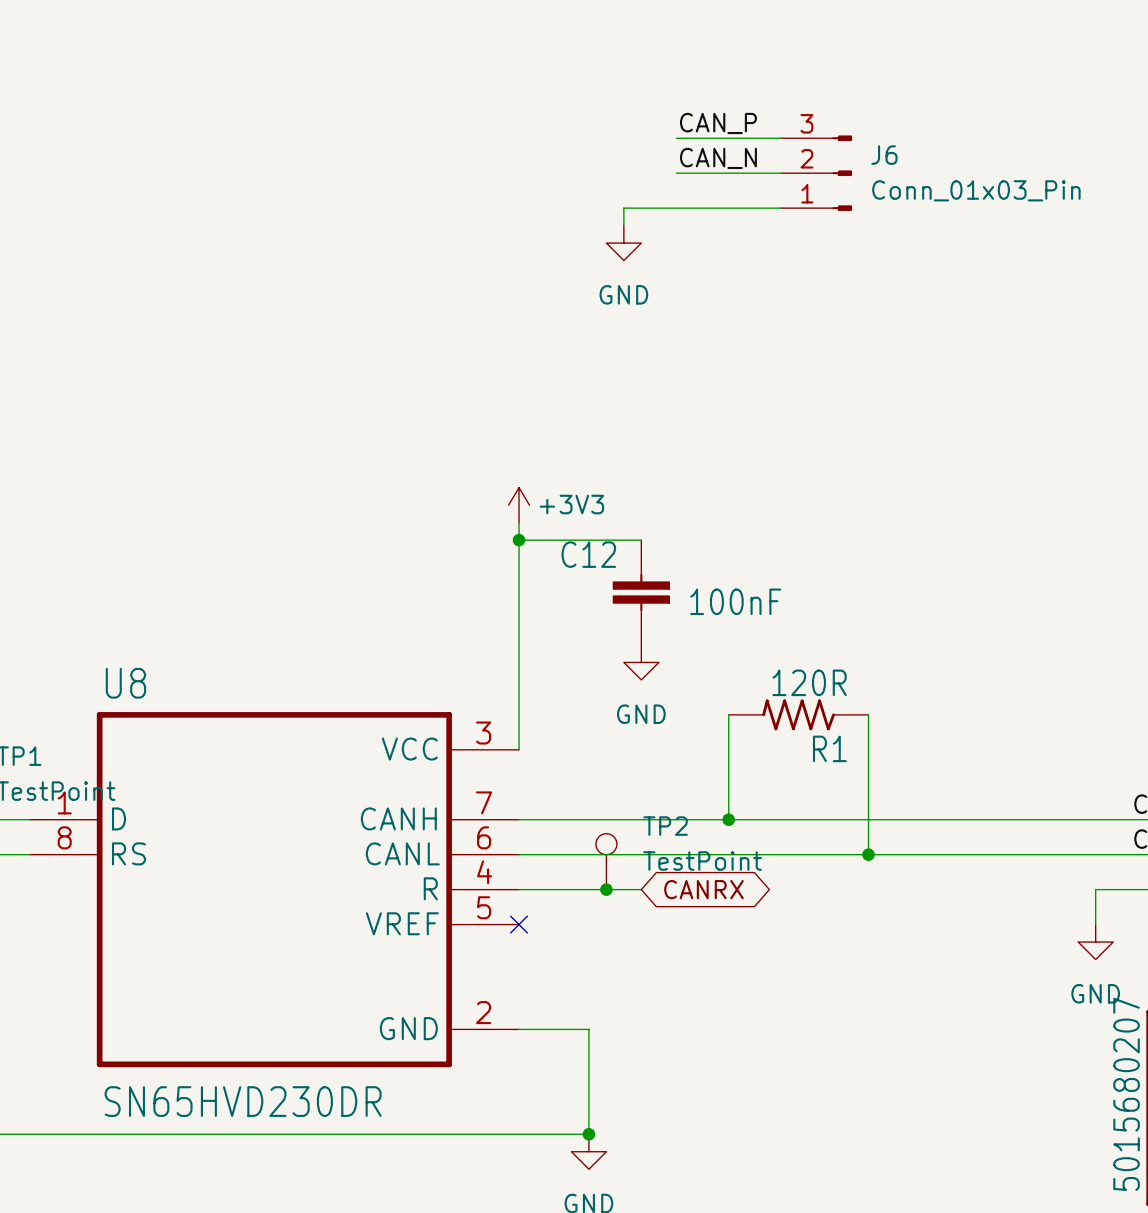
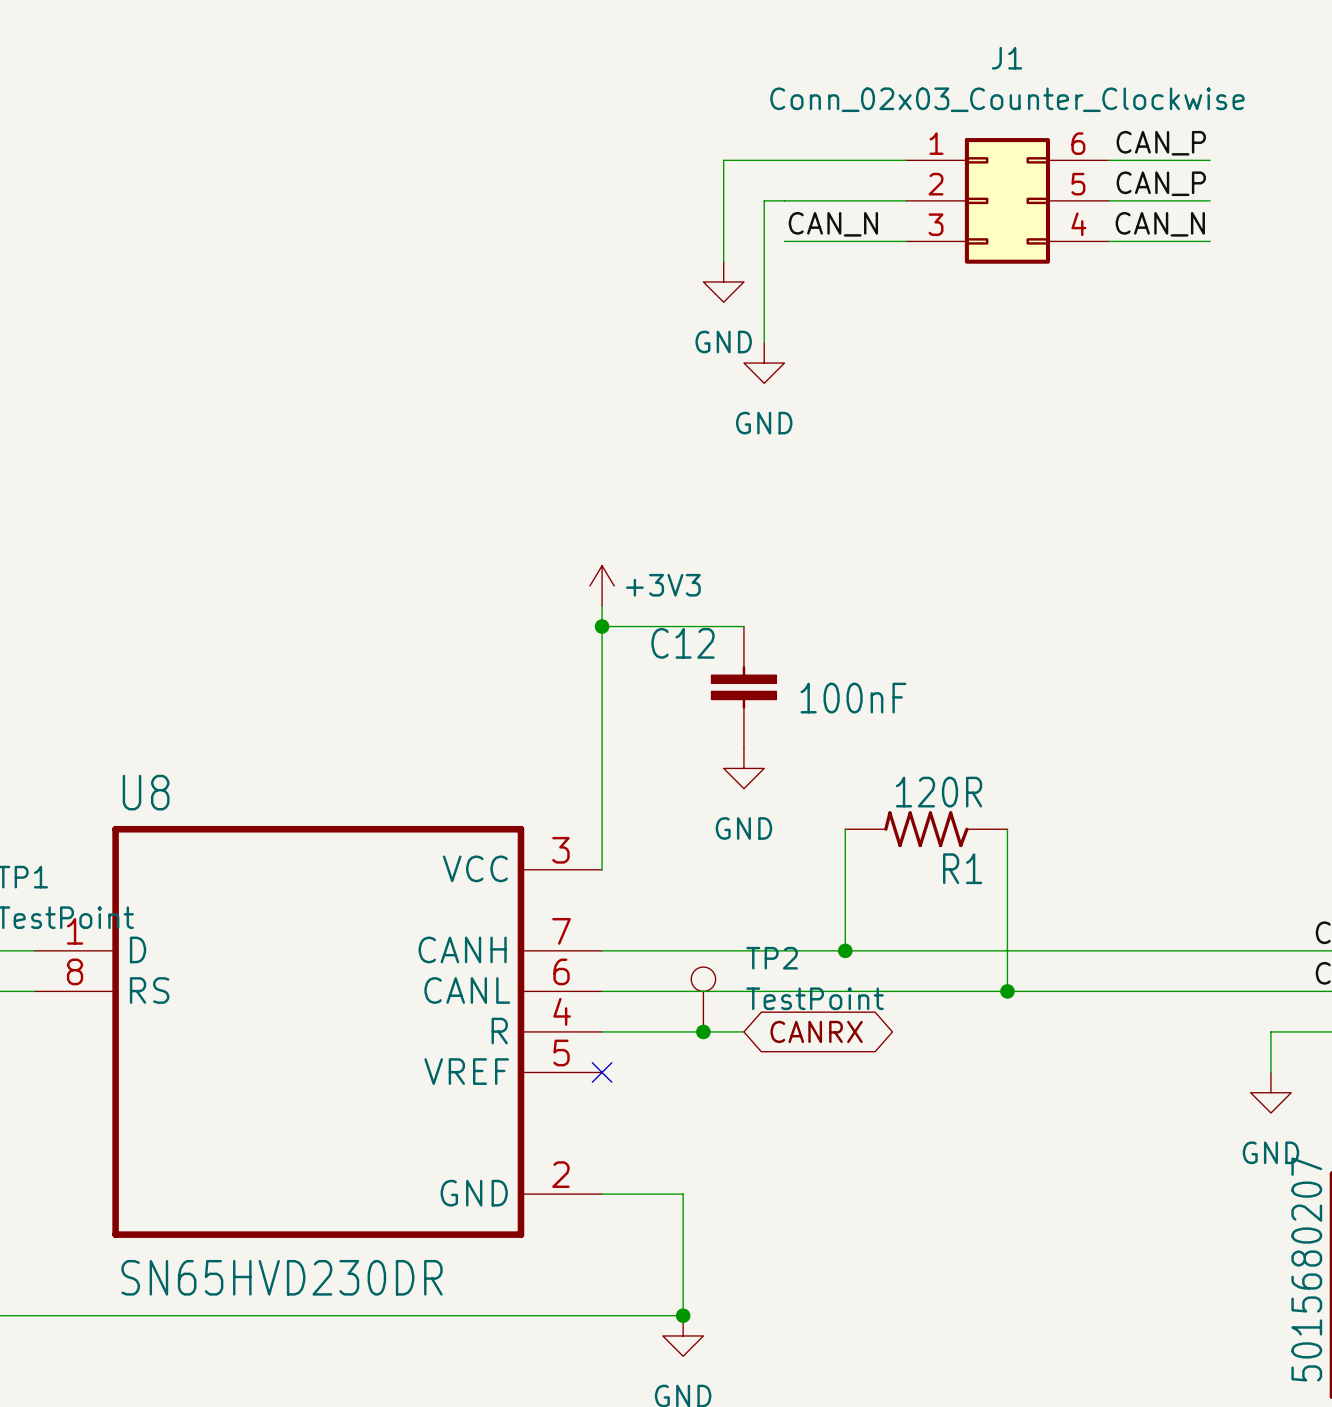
label: CAN_P (718, 123) -> none
label: none -> CAN_P (1161, 143)
wire: none -> (1108, 160) (1210, 160)
label position: CAN_N (718, 158) -> CAN_N (833, 224)
label: none -> CAN_P (1161, 183)
wire: none -> (784, 200) (764, 200) (764, 342)
J6: Conn_01x03_Pin (816, 173) -> none
J1: none -> Conn_02x03_Counter_Clockwise (1007, 200)
wire: none -> (1108, 200) (1210, 200)
label: none -> CAN_N (1160, 224)
wire: (623, 208) (676, 208) -> (723, 241) (723, 160) (784, 160)
wire: none -> (1108, 241) (1210, 241)
power symbol: none -> GND (764, 363)

